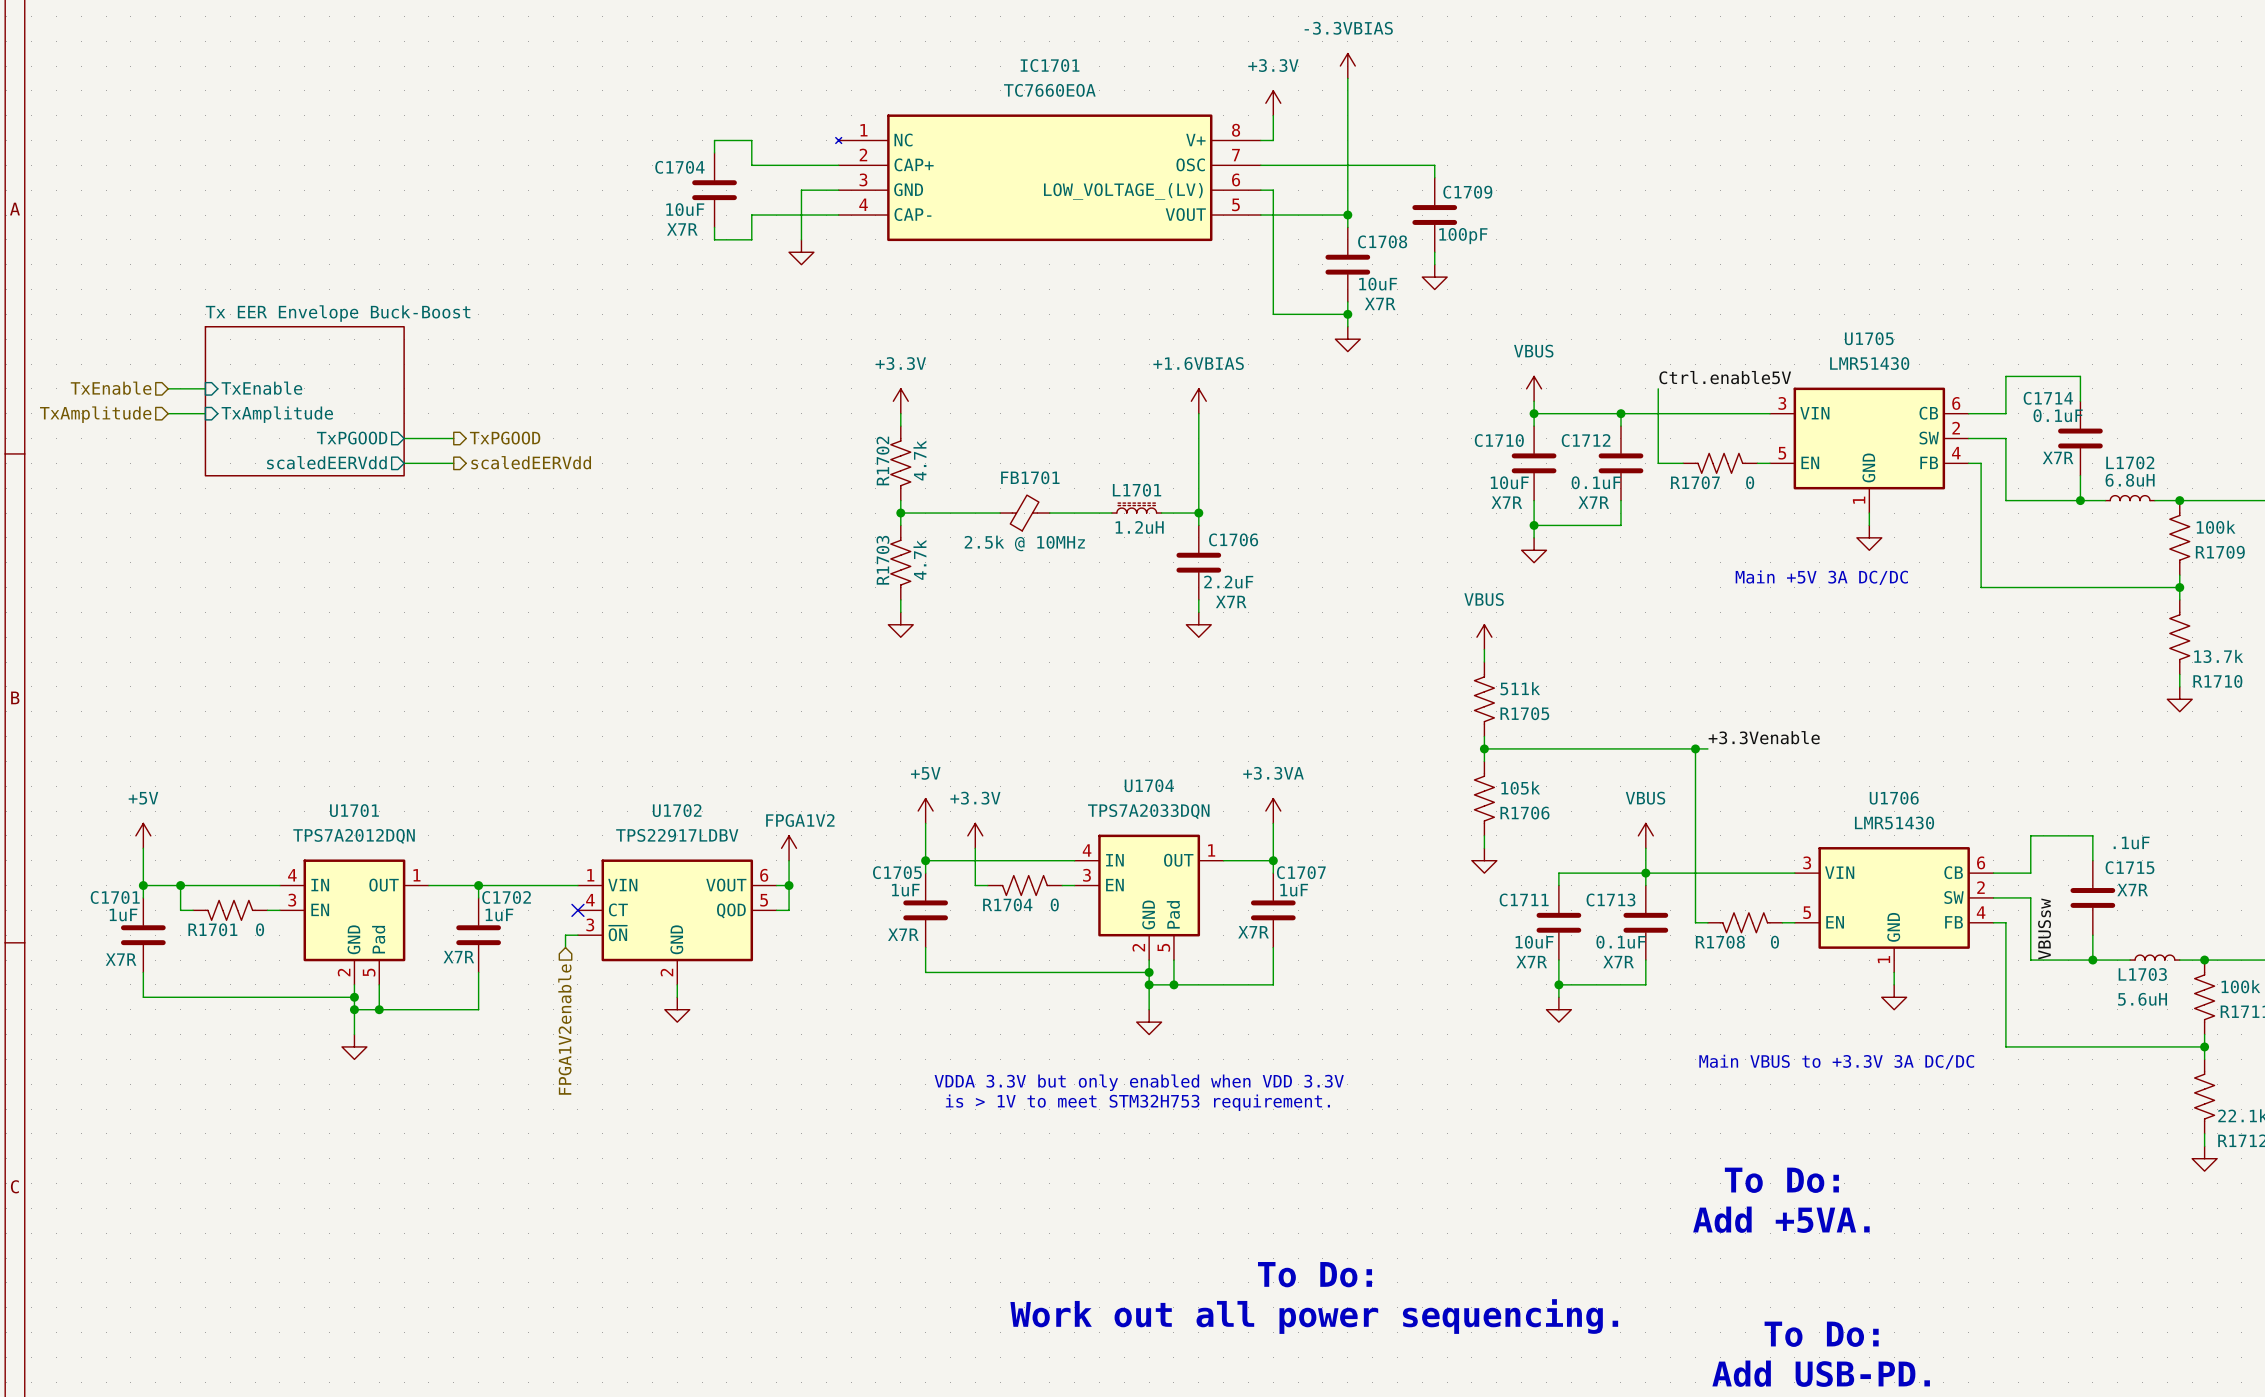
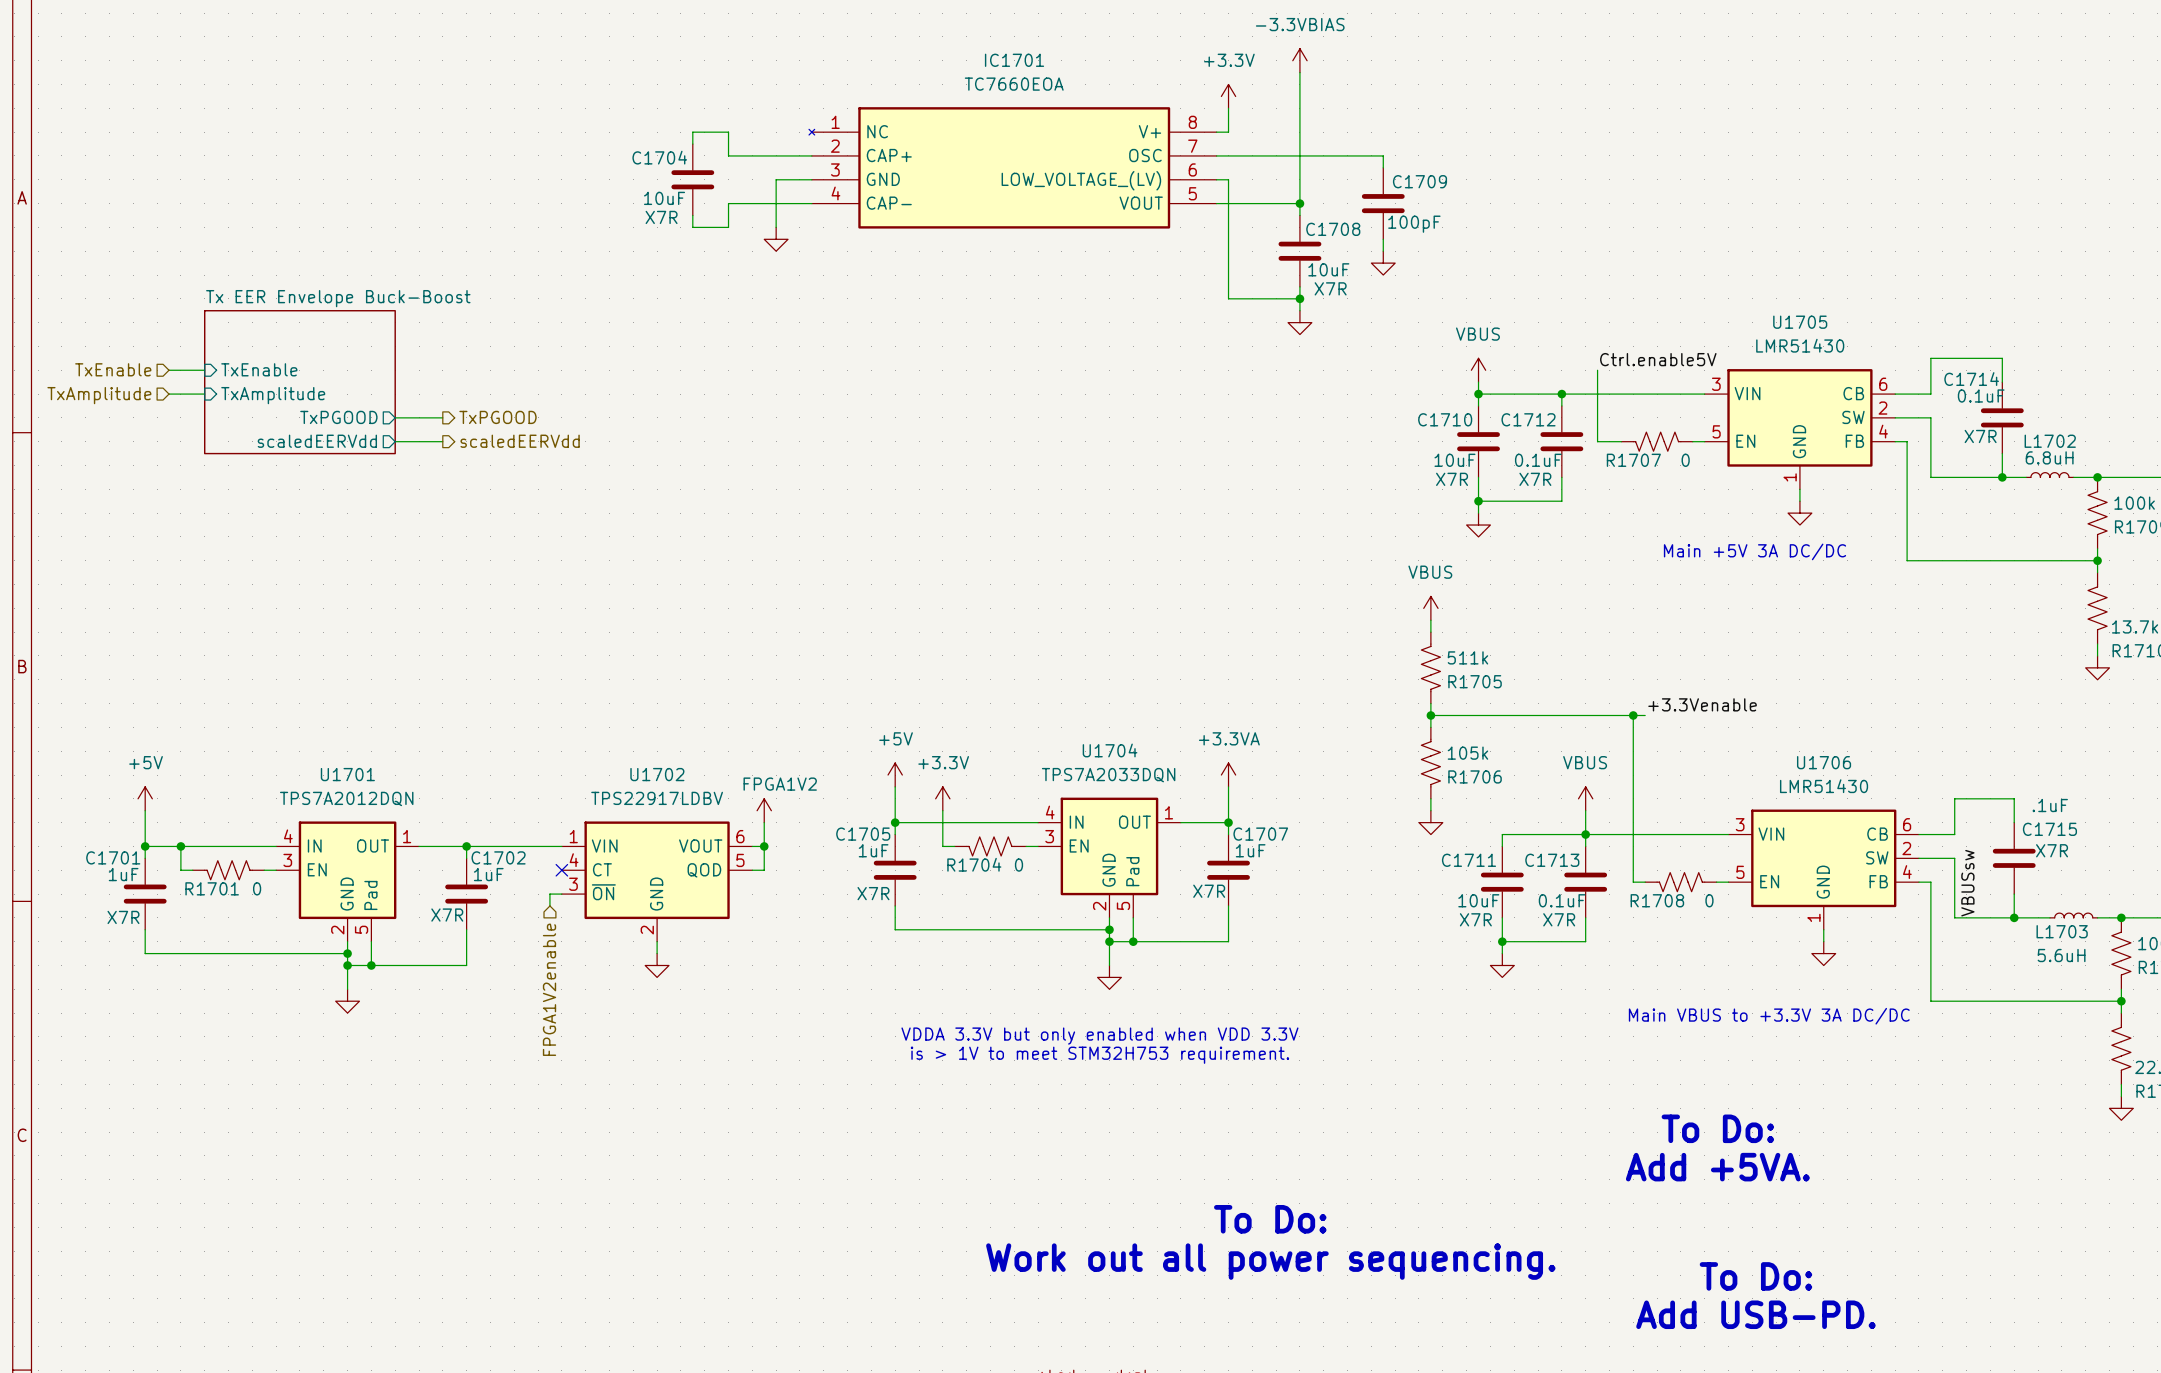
power symbol: +3.3V (900, 401) -> none
power symbol: +1.6VBIAS (1198, 401) -> none
wire: (900, 413) (900, 426) -> none
wire: (1198, 413) (1198, 525) -> none
R1702: 4.7k (900, 463) -> none
wire: (900, 500) (900, 525) -> none
L1701: 1.2uH (1136, 508) -> none
wire: (900, 513) (1000, 513) -> none
junction: (900, 513) -> none
FB1701: 2.5k @ 10MHz (1024, 513) -> none
wire: (1049, 513) (1111, 513) -> none
wire: (1161, 513) (1198, 513) -> none
junction: (1198, 513) -> none
R1703: 4.7k (900, 562) -> none
C1706: 2.2uF (1198, 562) -> none
wire: (900, 599) (900, 612) -> none
wire: (1198, 599) (1198, 612) -> none
power symbol: (900, 624) -> none
power symbol: (1198, 624) -> none

